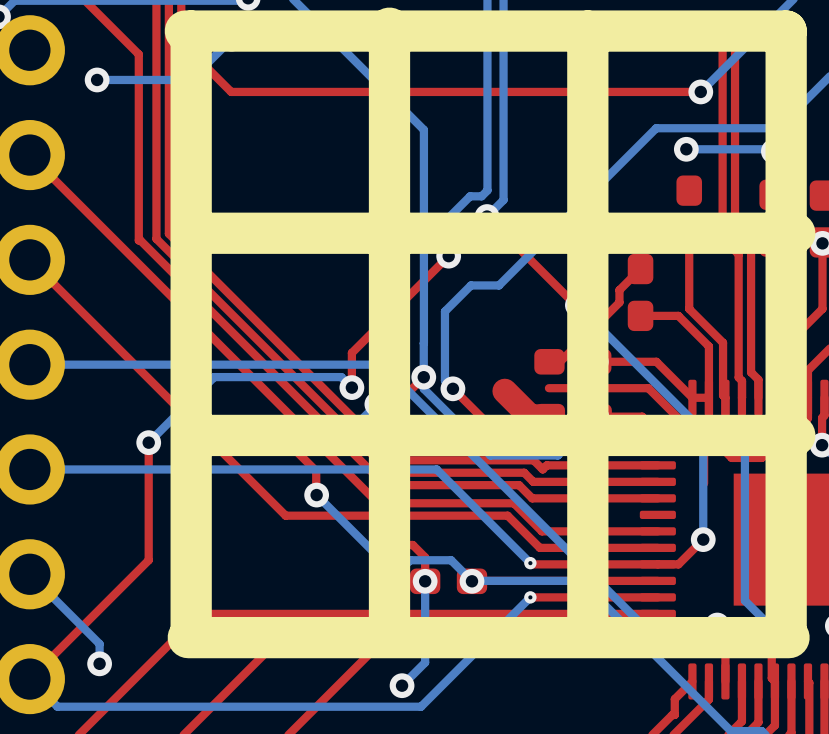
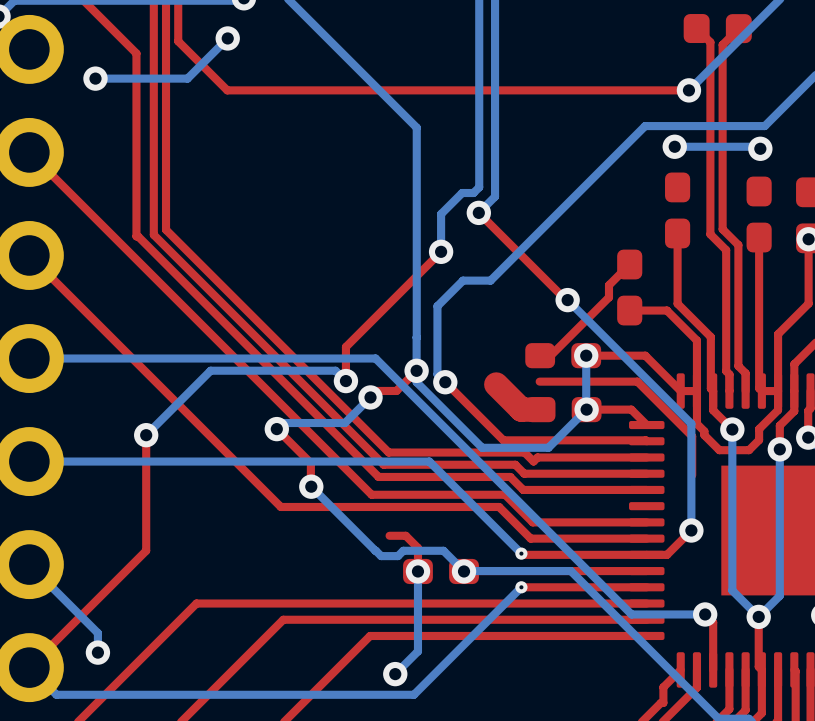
line: (389, 28) (389, 628) -> none
line: (185, 31) (786, 31) (786, 631) -> none
line: (191, 31) (191, 631) -> none
line: (587, 31) (587, 631) -> none
line: (794, 233) (194, 233) -> none
line: (794, 435) (194, 435) -> none
line: (789, 637) (188, 637) -> none

